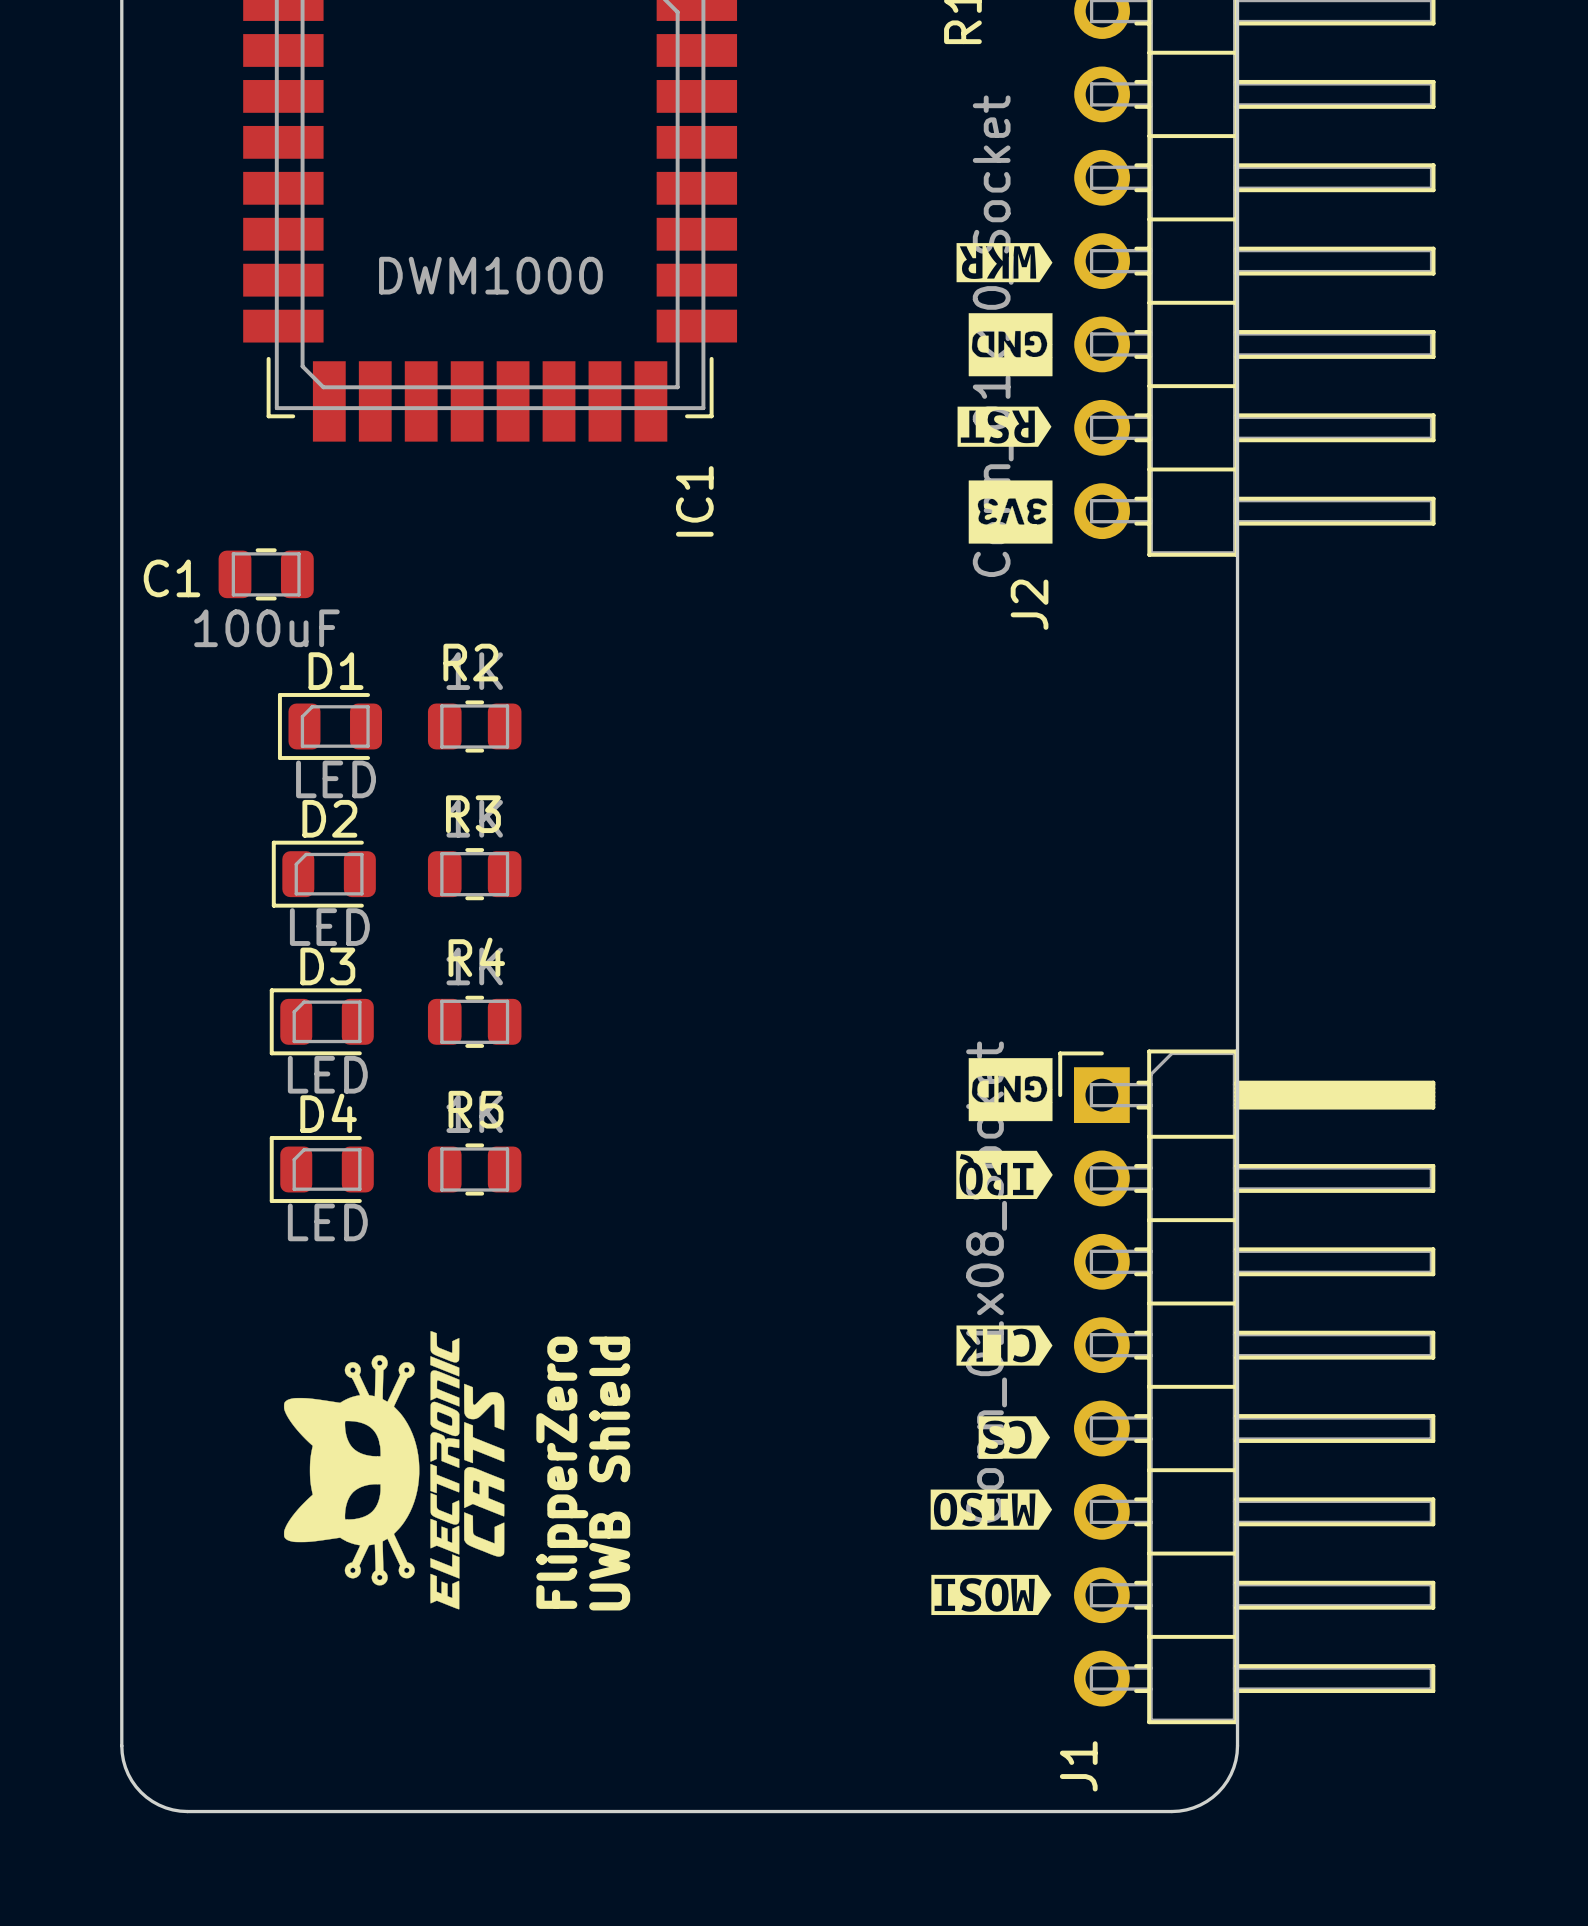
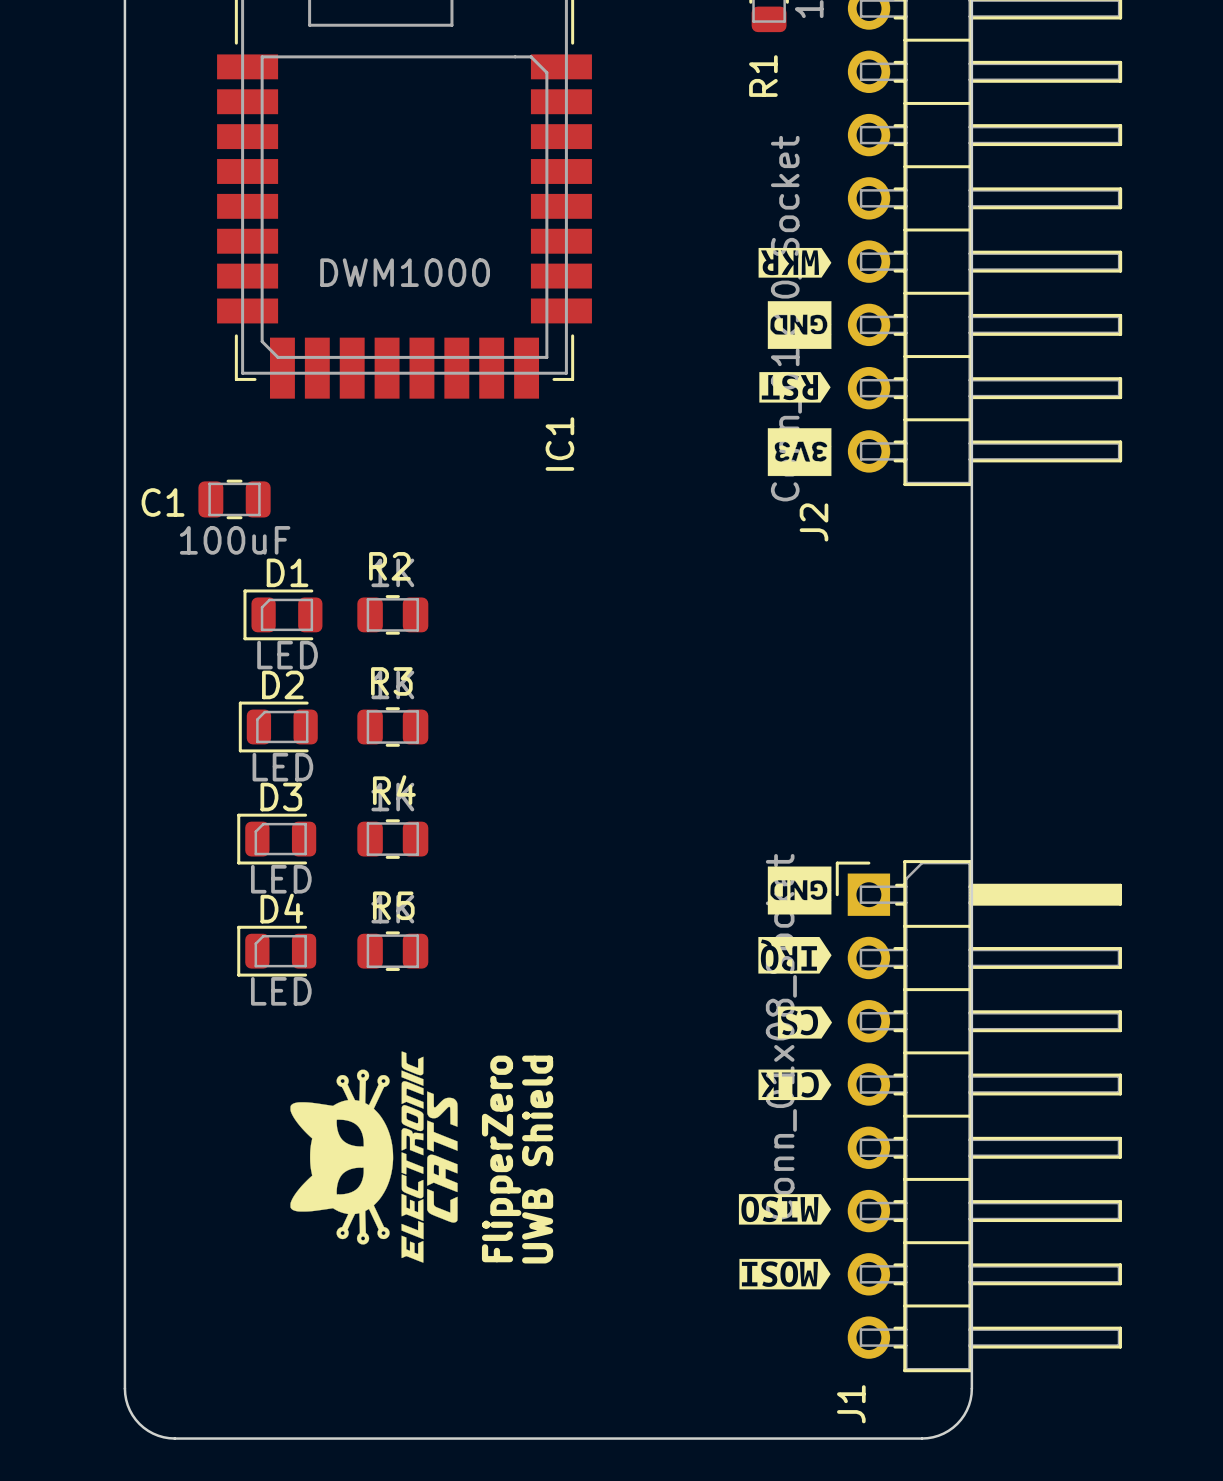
drawing position: (1014, 1437) -> (804, 1022)
text: none -> UWB Shield (537, 1159)
drawing position: (394, 1470) -> (374, 1157)
text: FlipperZero (562, 1472) -> none
text: UWB Shield (609, 1473) -> FlipperZero (501, 1158)

